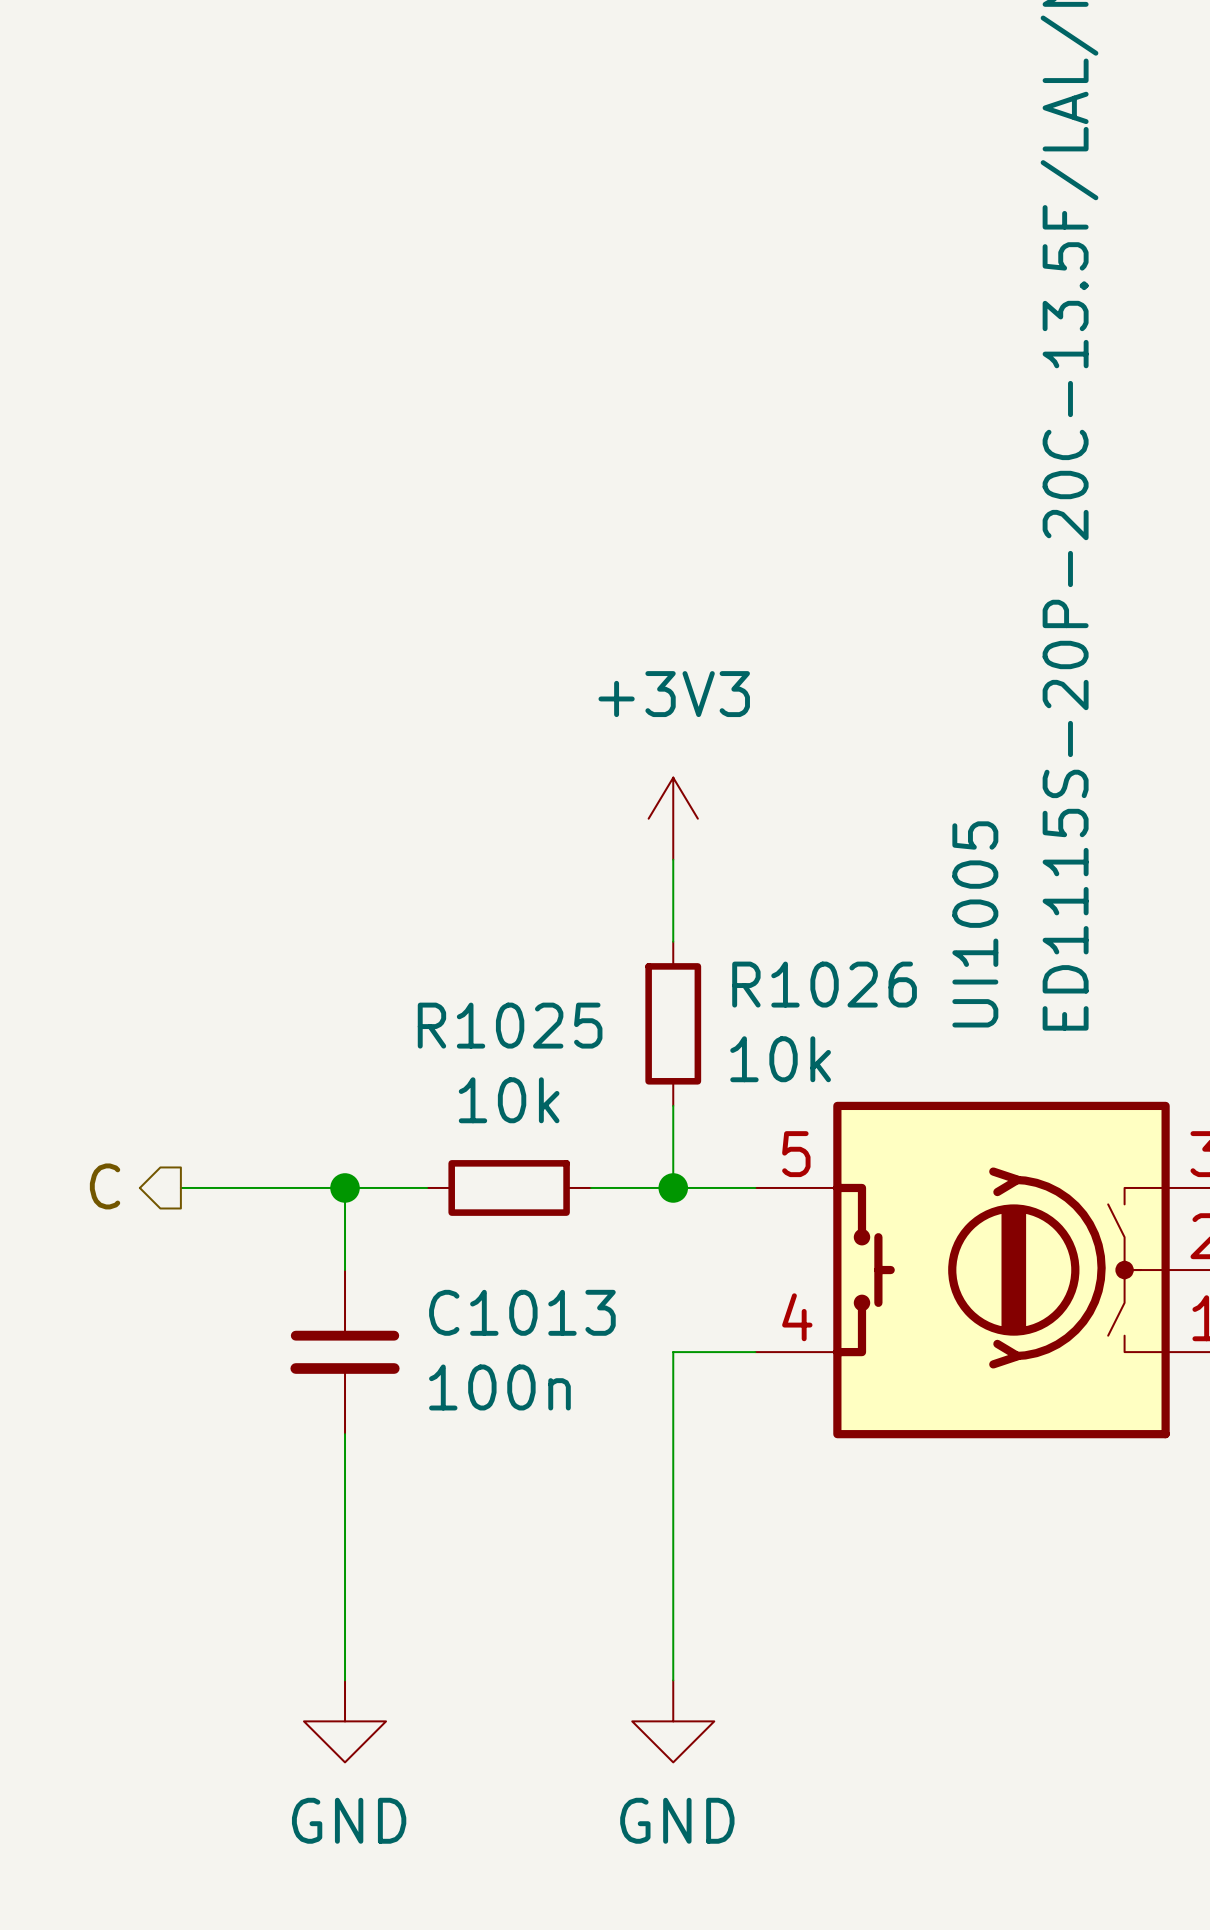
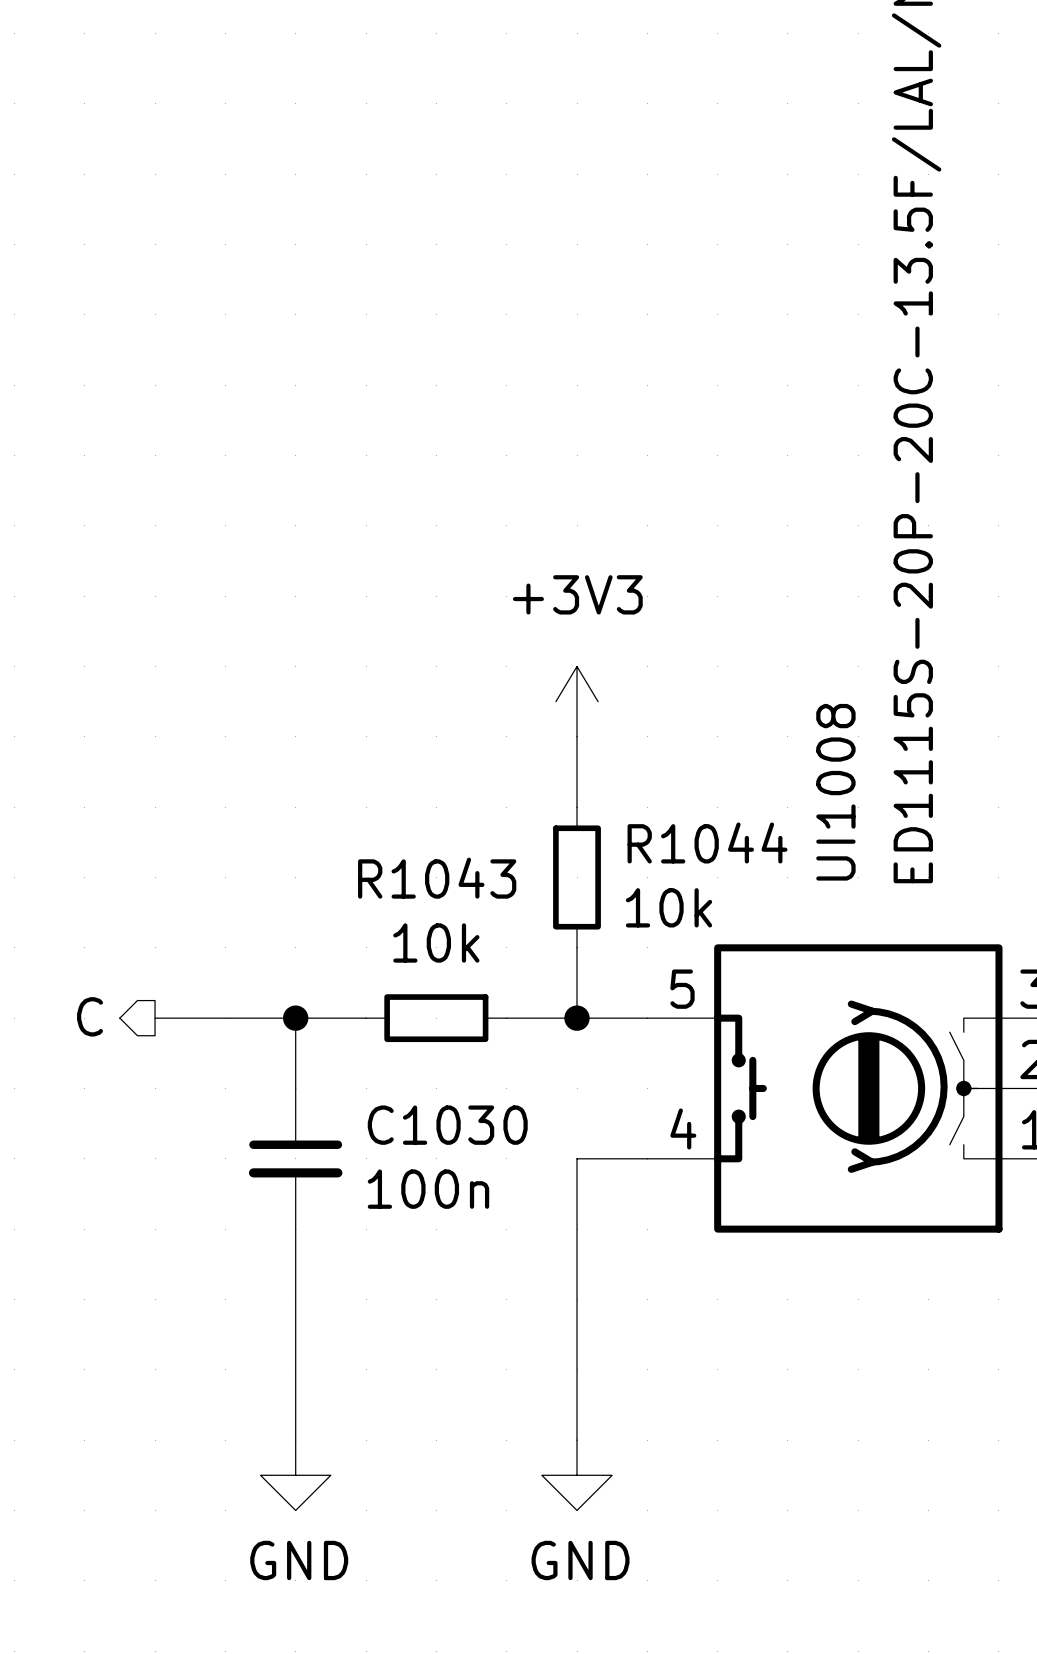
UI1005 name: UI1005 (975, 924) -> UI1008 (835, 792)
R1026 name: R1026 (824, 984) -> R1044 (707, 842)
R1025 name: R1025 (510, 1025) -> R1043 (437, 878)
C1013 name: C1013 (522, 1312) -> C1030 (447, 1125)

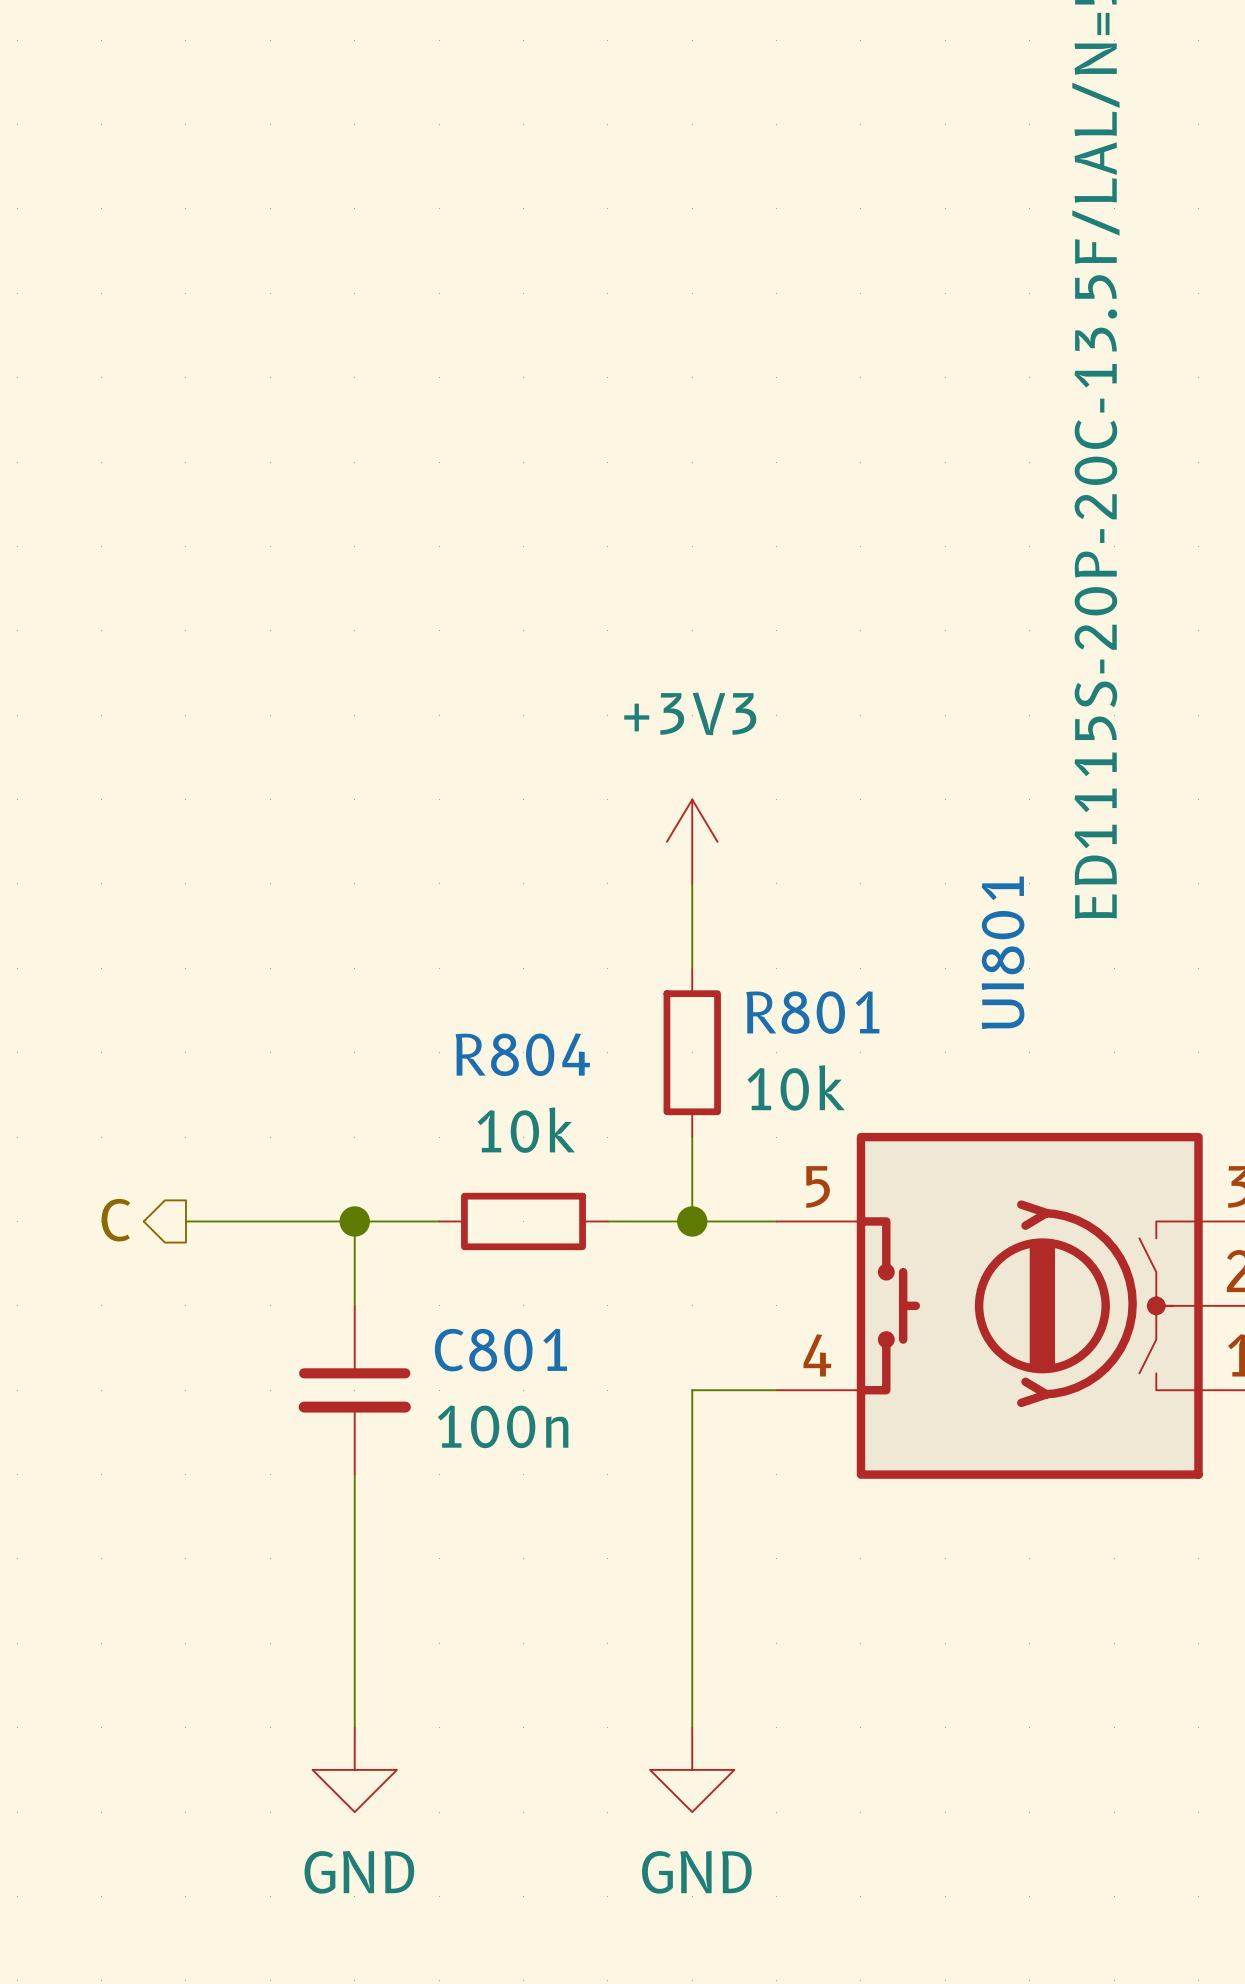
UI1008 name: UI1008 (835, 792) -> UI801 (1003, 952)
R1044 name: R1044 (707, 842) -> R801 (812, 1012)
R1043 name: R1043 (437, 878) -> R804 (522, 1054)
C1030 name: C1030 (447, 1125) -> C801 (500, 1350)

